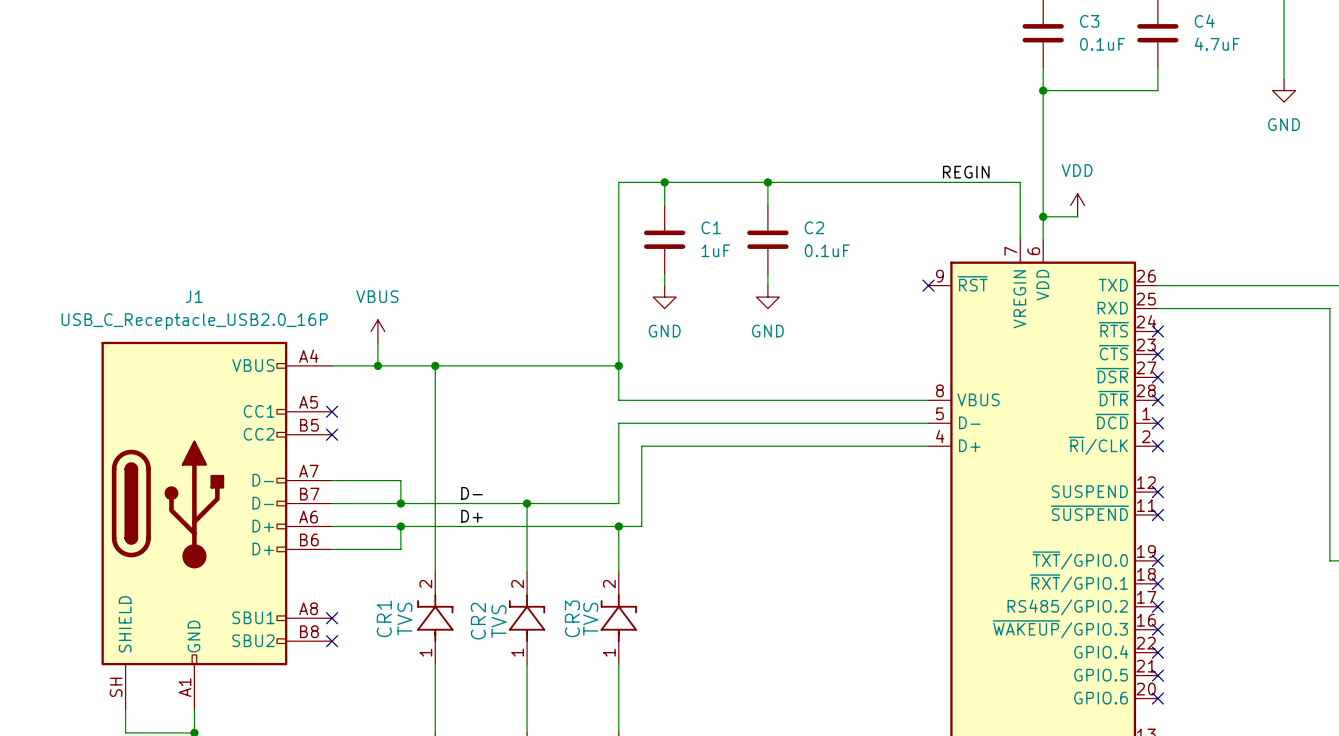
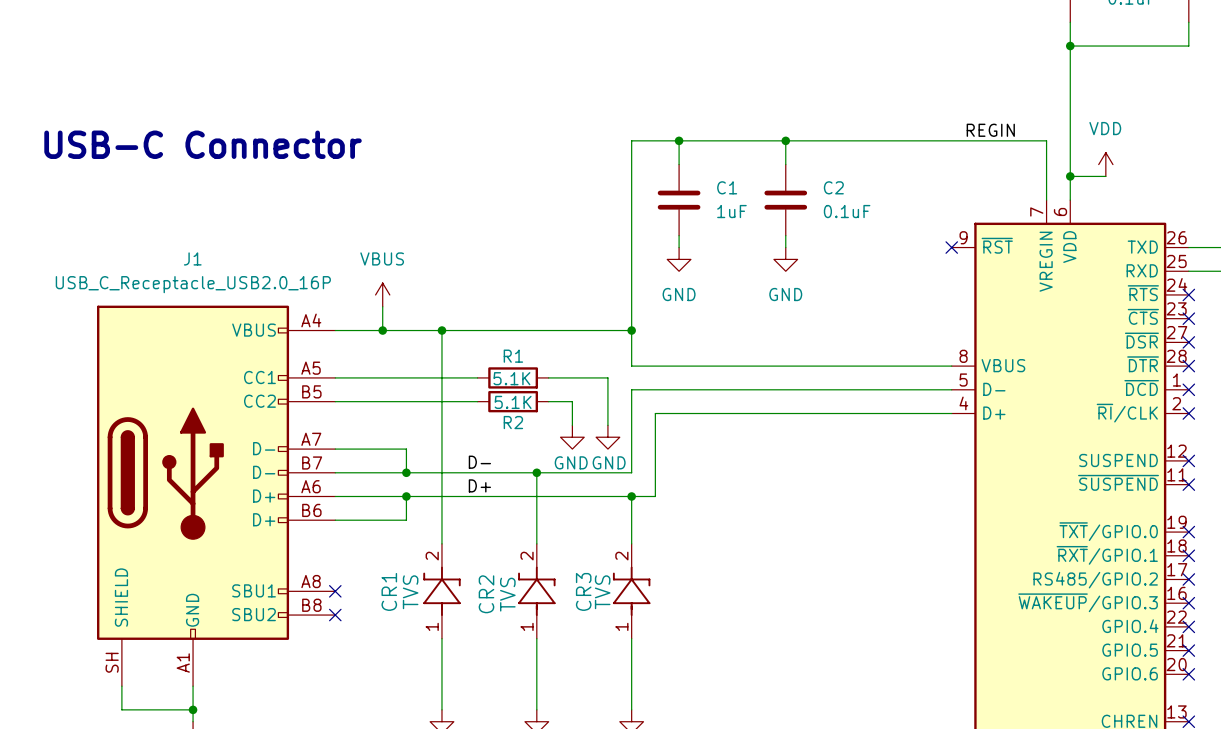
text: none -> USB-C Connector (203, 144)
wire: none -> (335, 377) (477, 377)
no-connect mark: (332, 411) -> none
R1: none -> 5.1K (513, 377)
wire: none -> (548, 377) (607, 377) (607, 425)
wire: none -> (335, 401) (477, 401)
no-connect mark: (332, 434) -> none
R2: none -> 5.1K (513, 401)
wire: none -> (548, 401) (572, 401) (572, 425)
power symbol: none -> GND (572, 437)
power symbol: none -> GND (607, 437)

